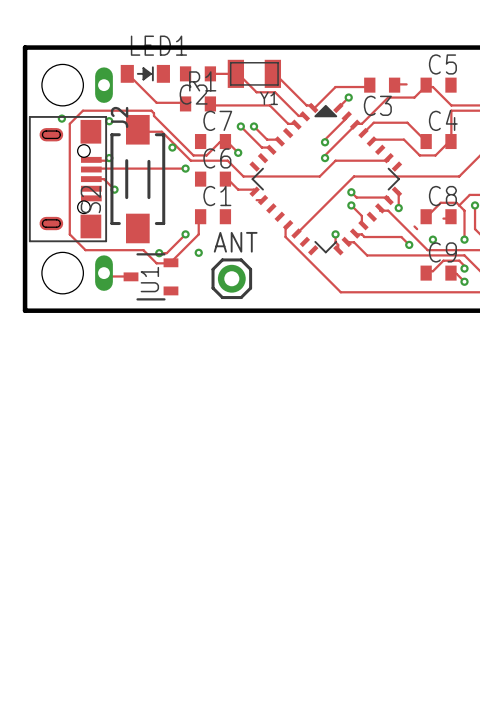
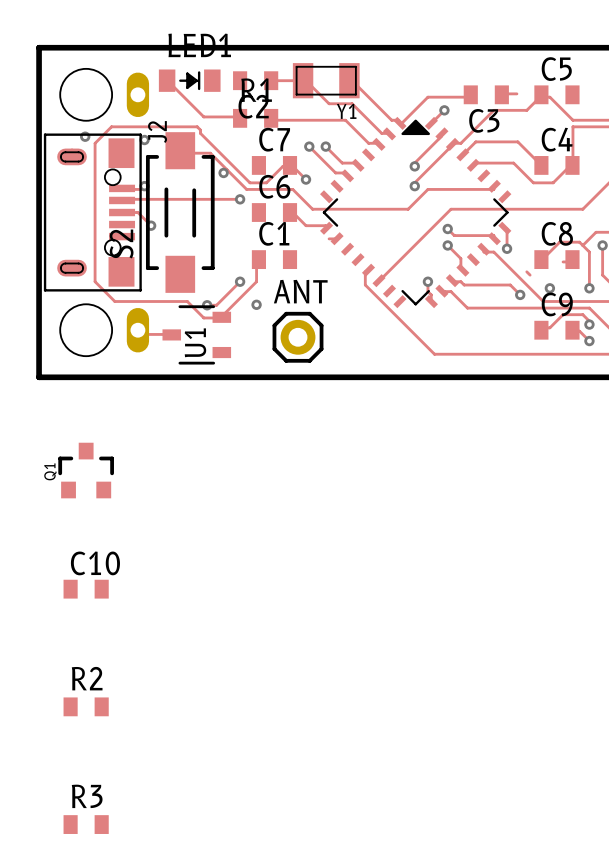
Q1: none -> (86, 470)
C10: none -> (86, 589)
R2: none -> (86, 706)
R3: none -> (86, 824)

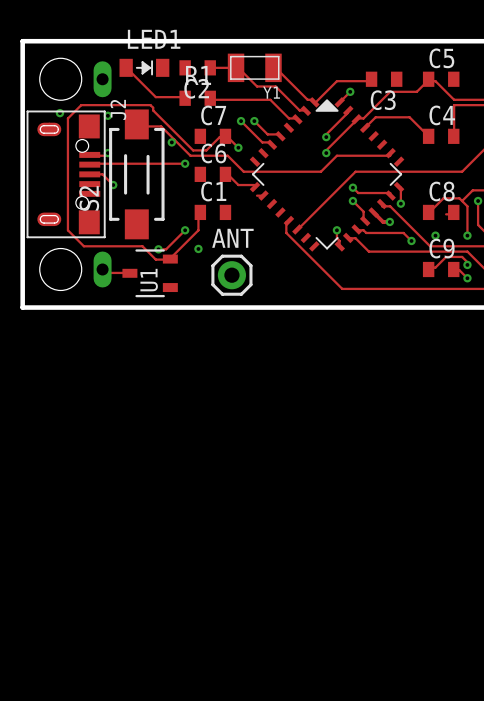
track: (503, 93) (516, 93) -> none
track: (474, 163) (513, 163) (533, 182) (553, 182) (569, 166) -> none
track: none -> (373, 212) (383, 221) (389, 221)
via: none -> (389, 221)
track: (526, 271) (530, 275) -> none
Q1: (86, 470) -> none
C10: (86, 589) -> none
R2: (86, 706) -> none
R3: (86, 824) -> none

